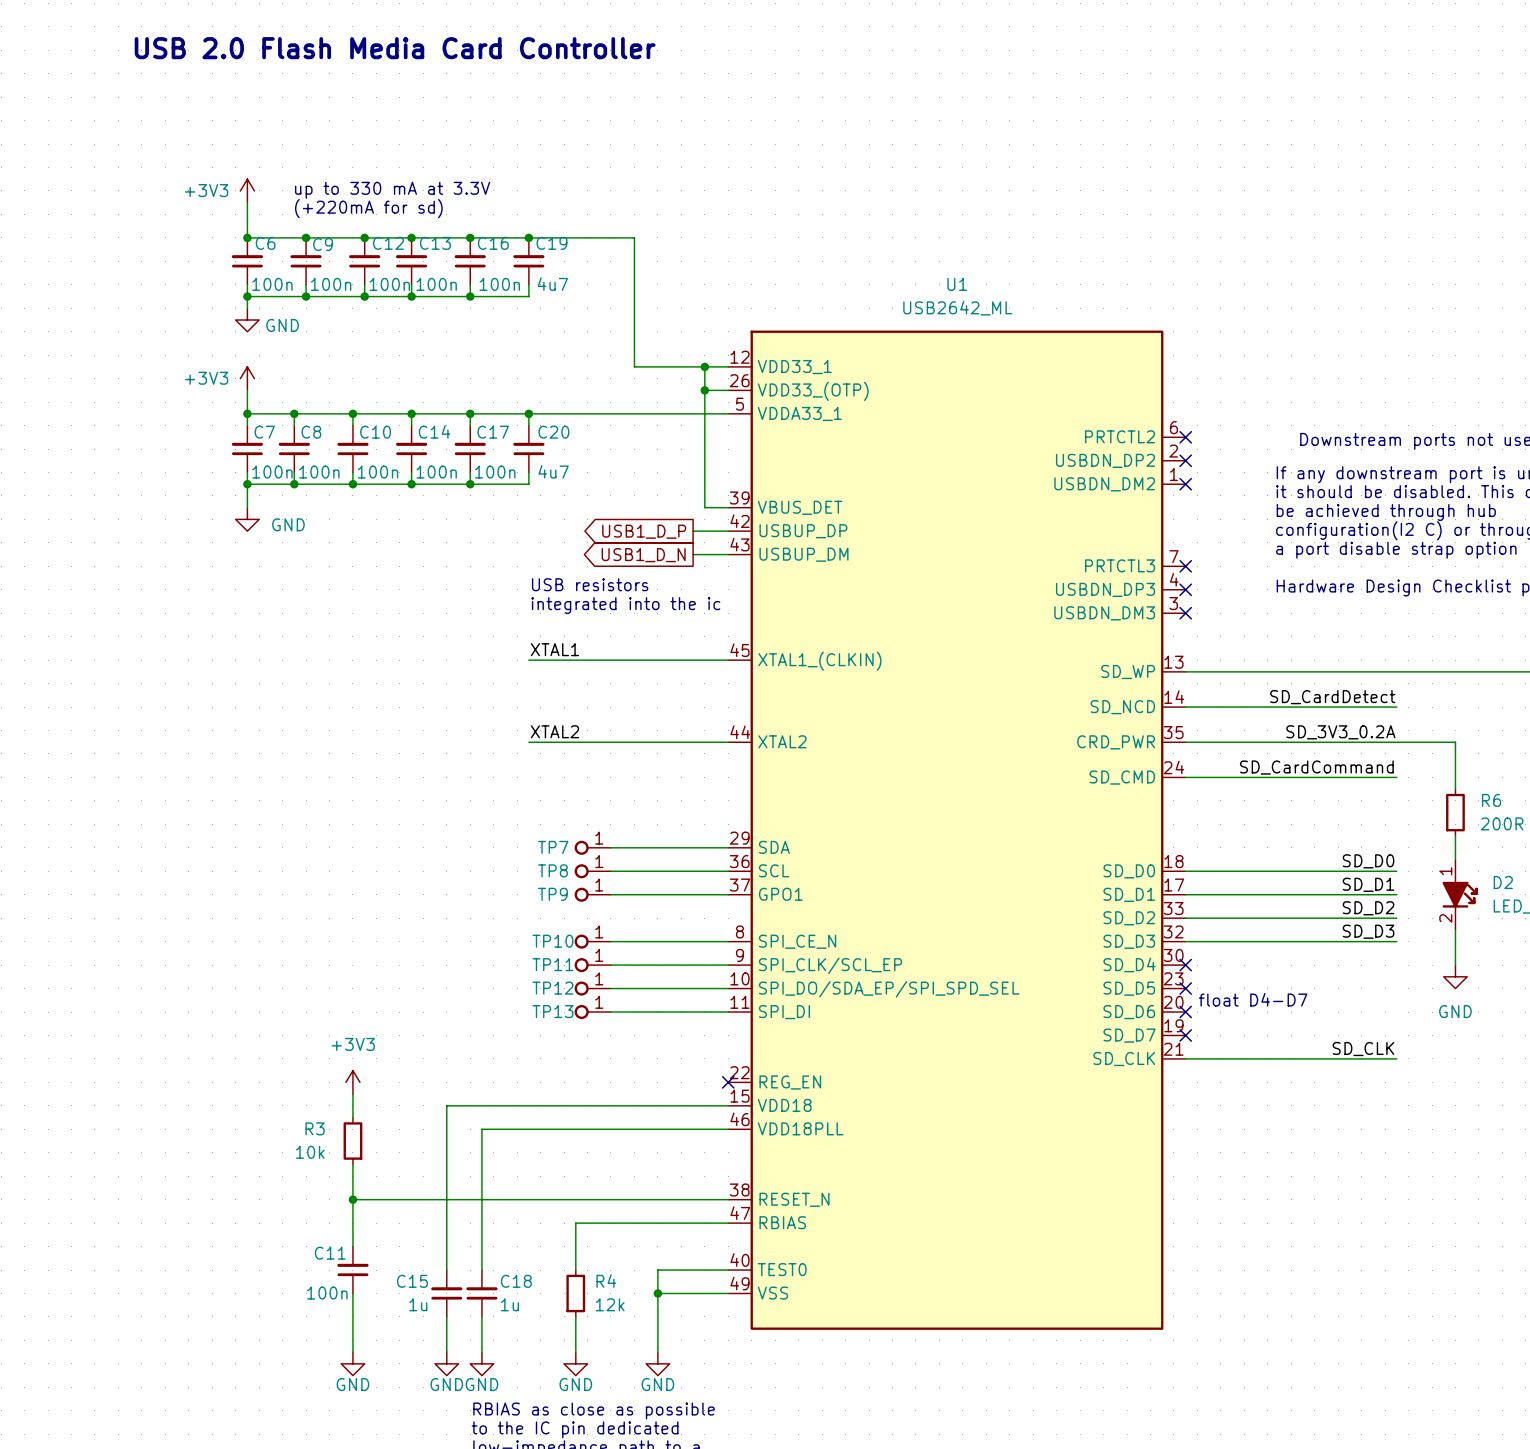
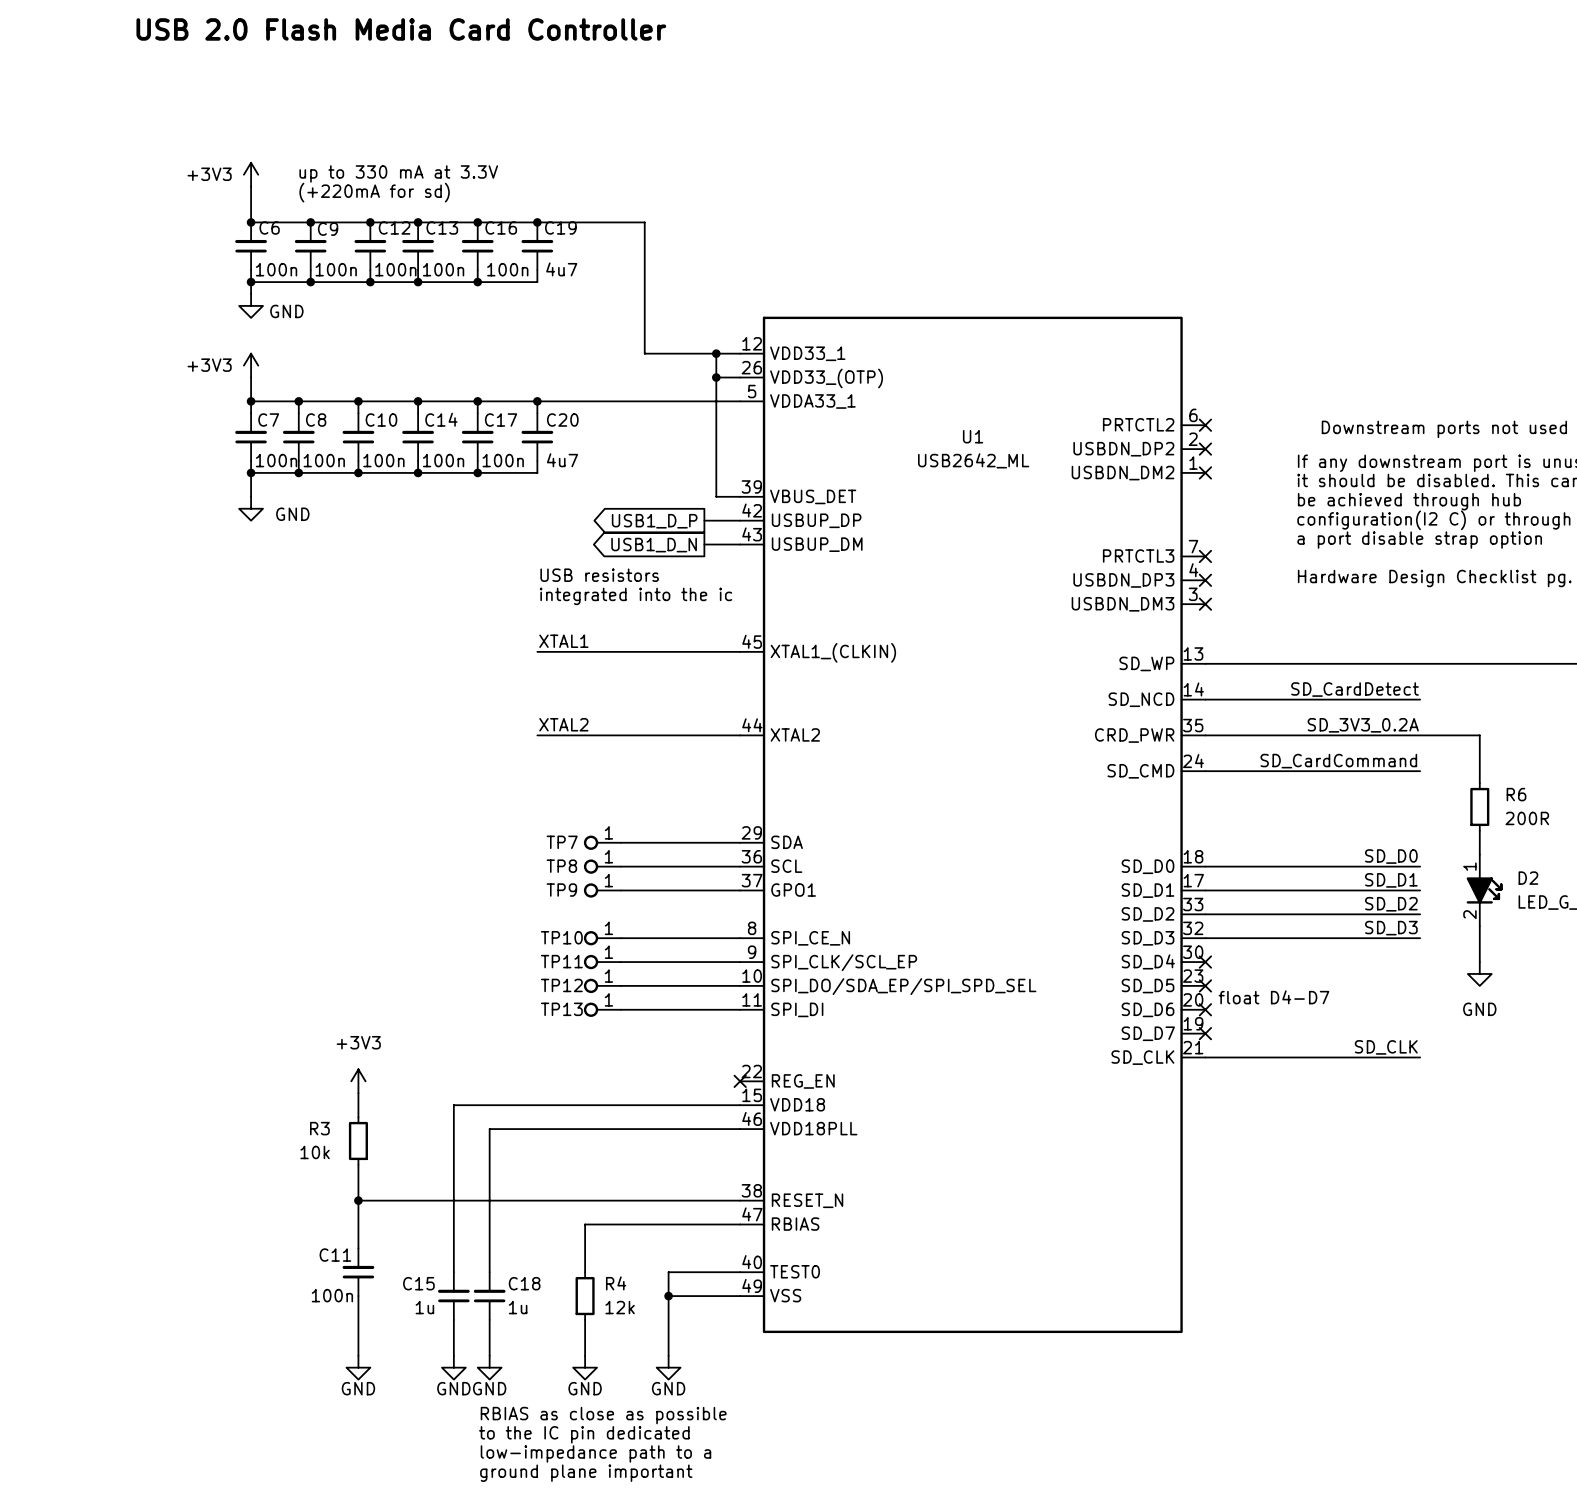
U1 name position: U1 (957, 284) -> U1 (973, 436)
U1 value position: USB2642_ML (957, 308) -> USB2642_ML (973, 460)

